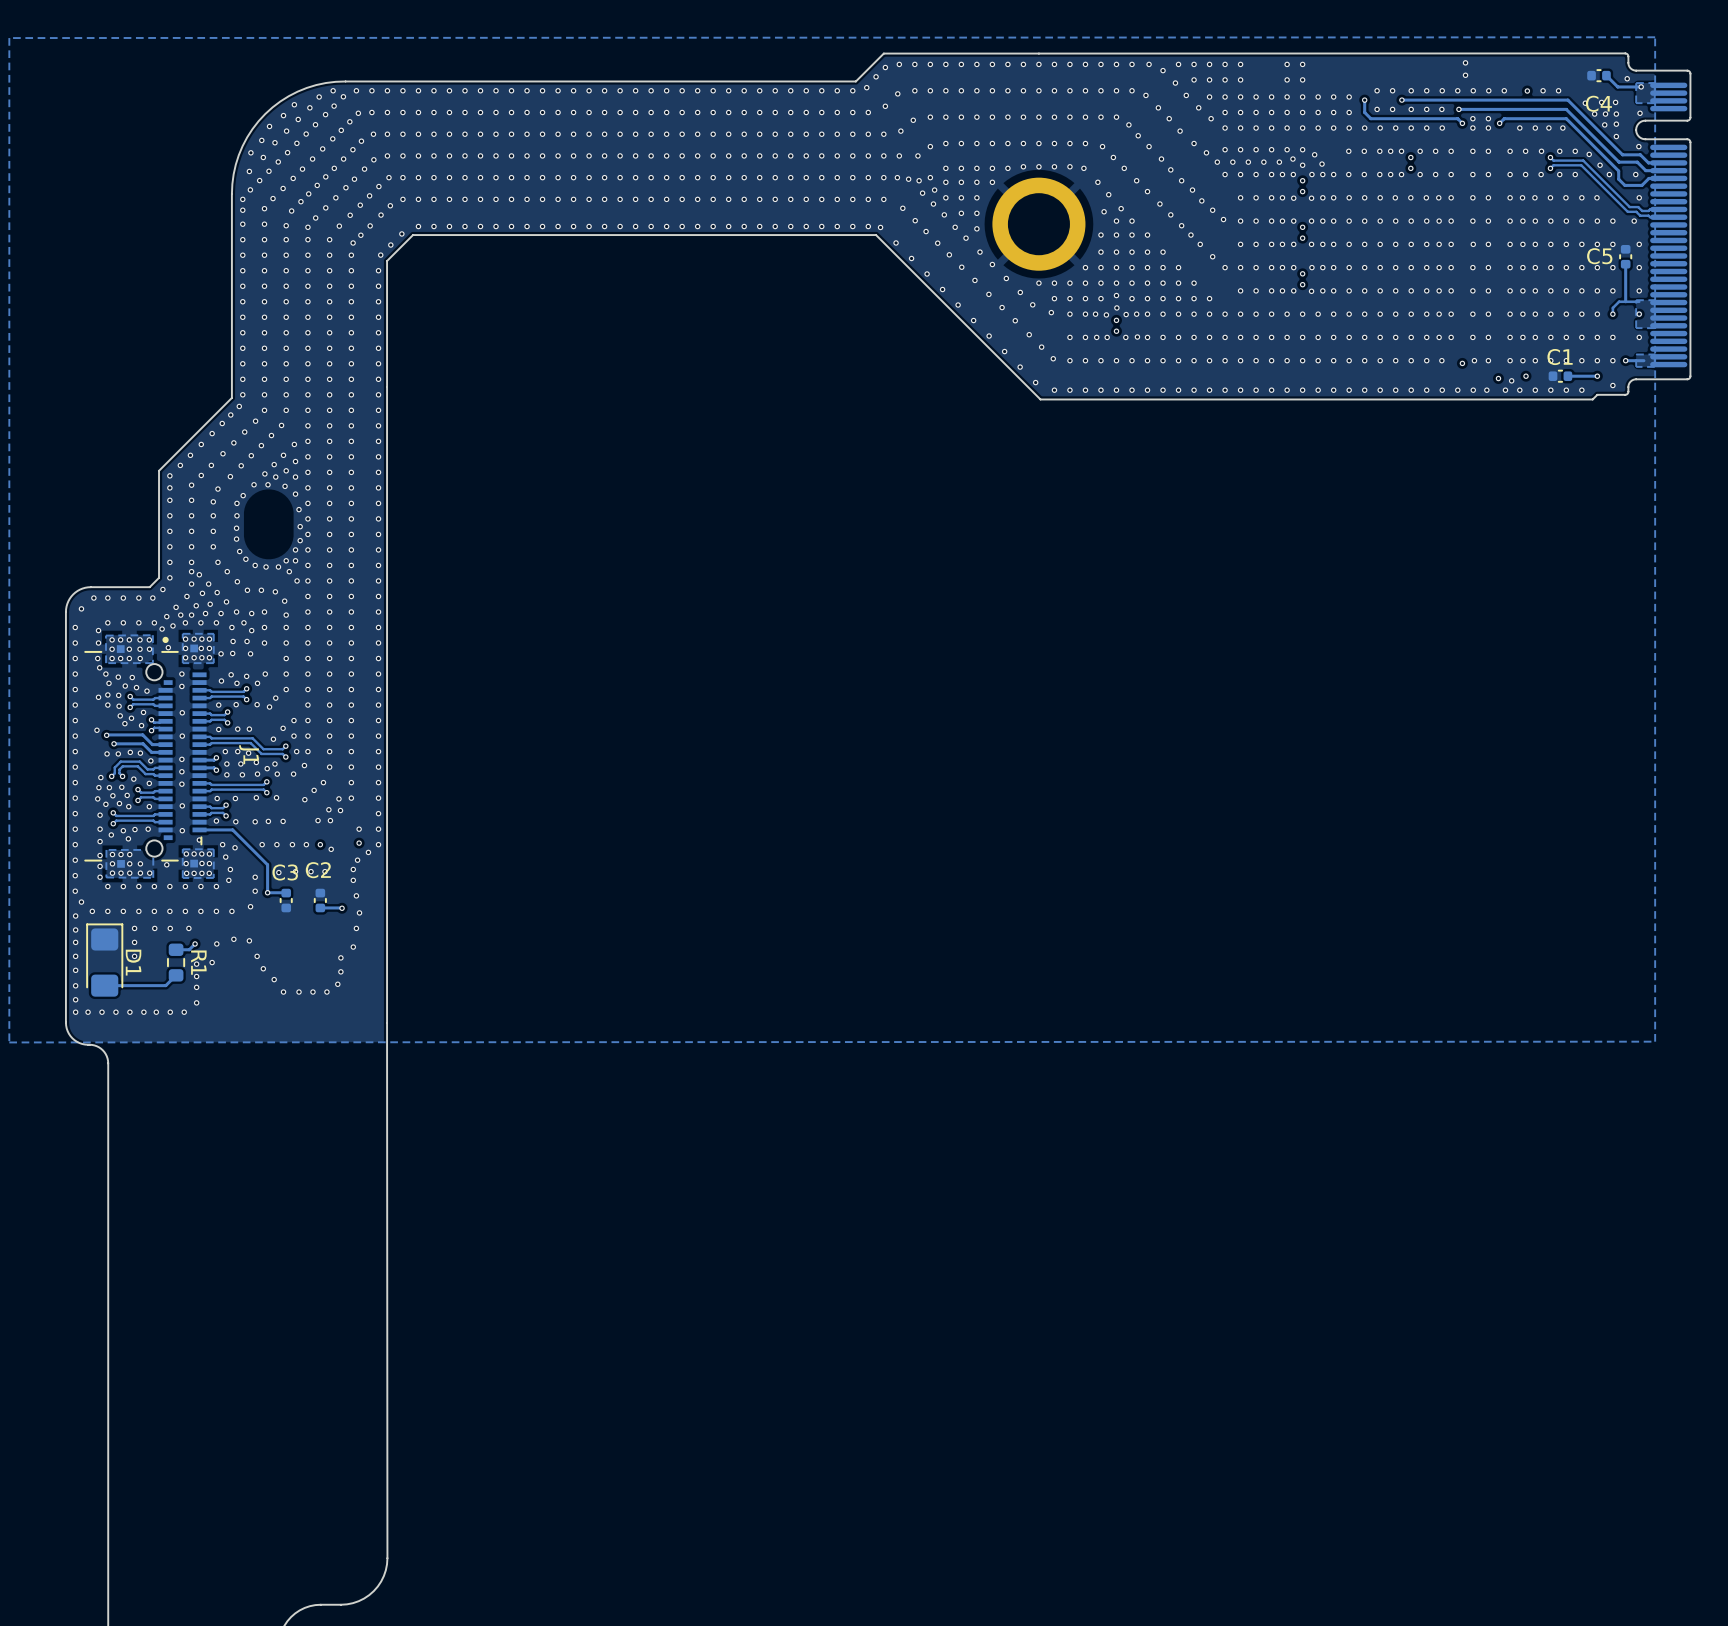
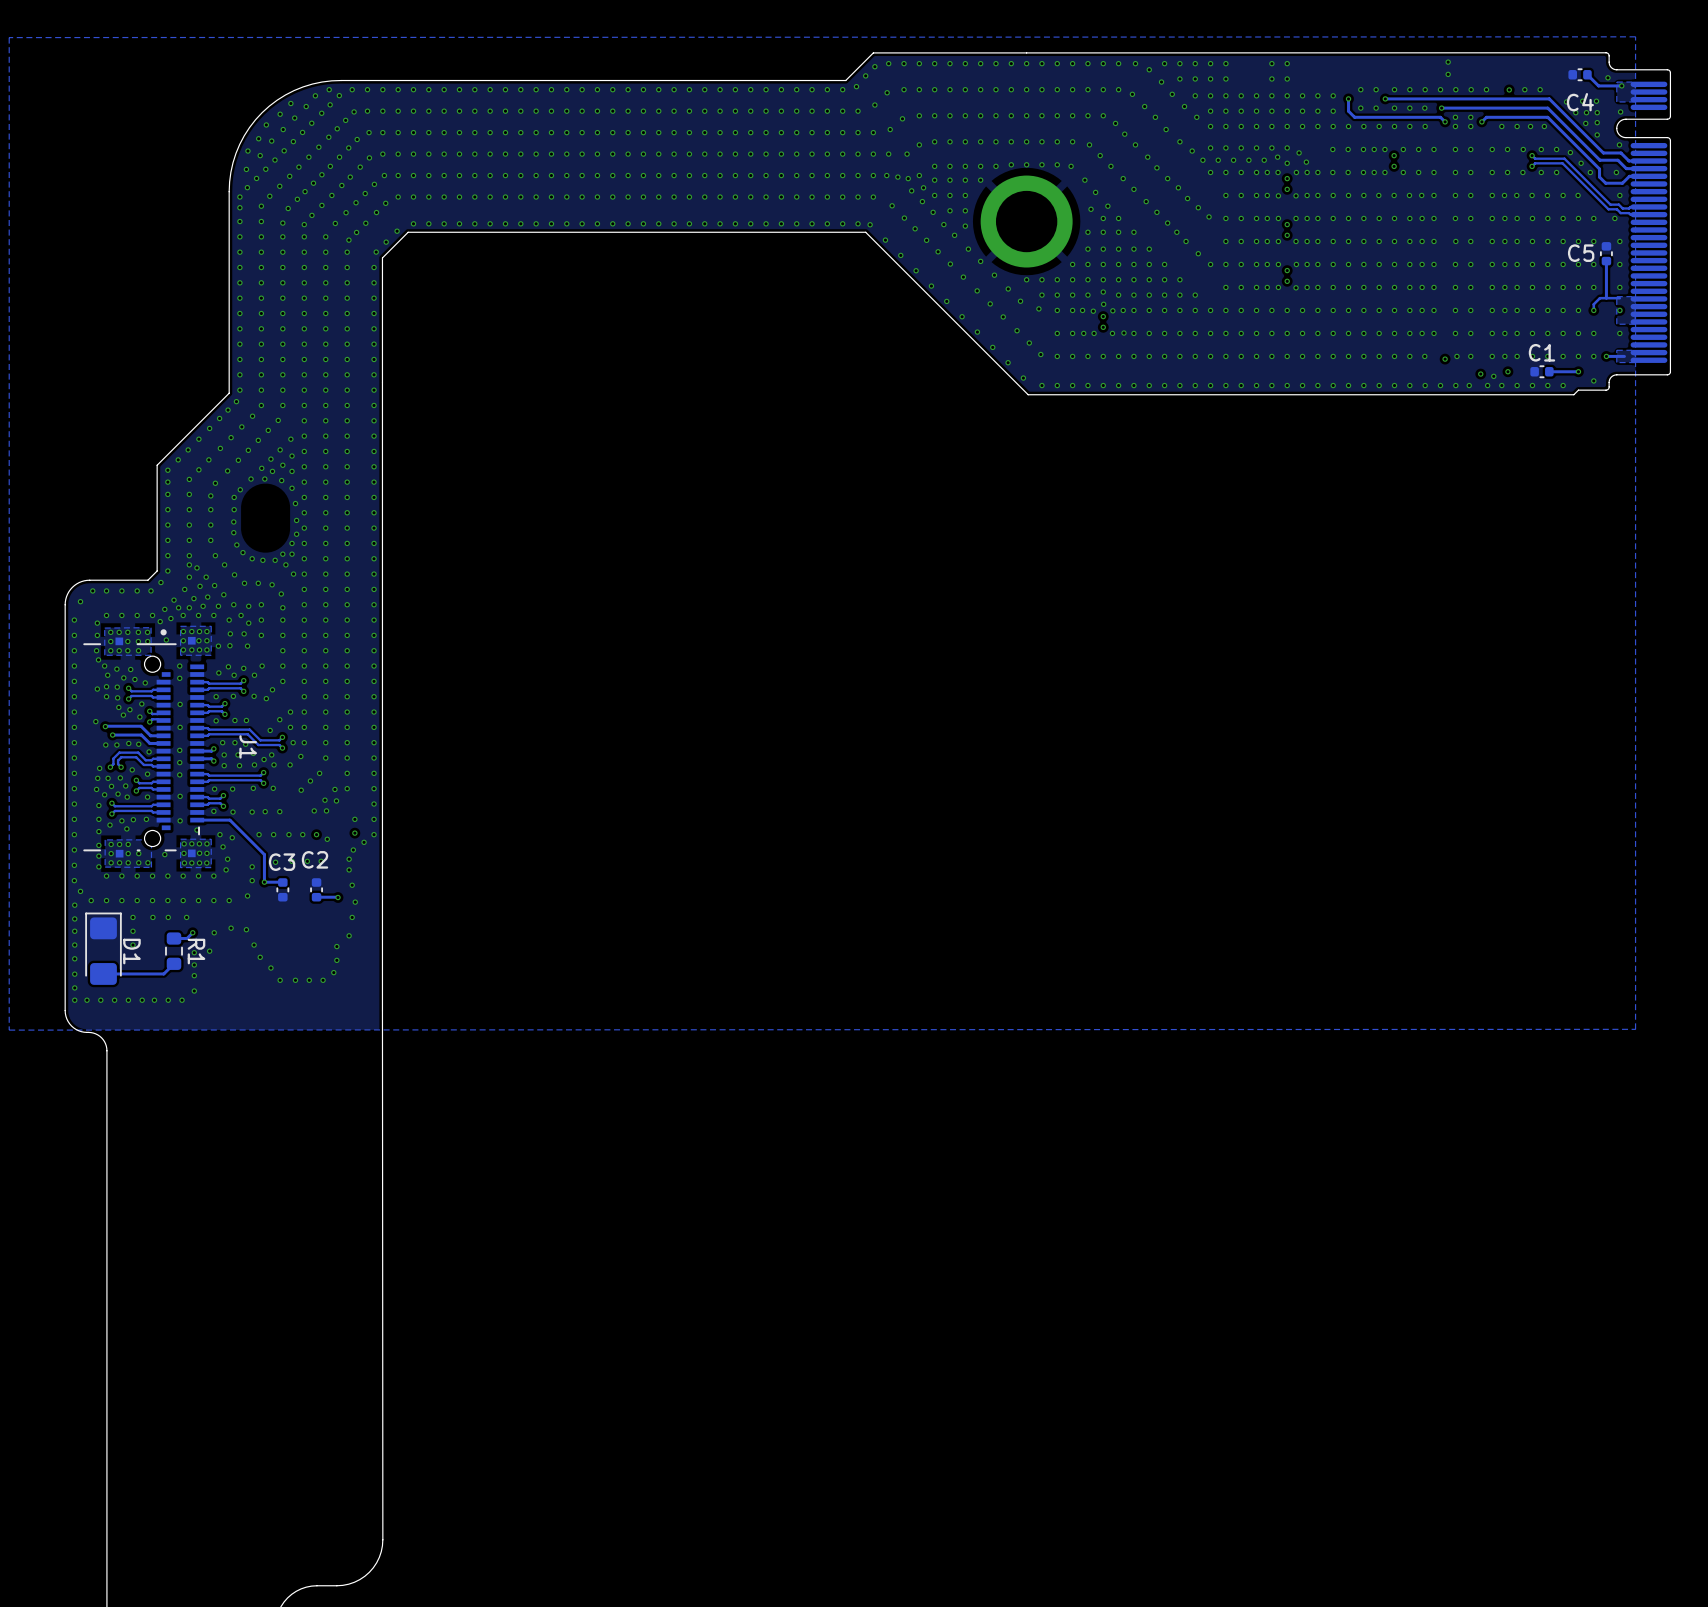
J1 footprint: [84, 636, 207, 868] -> [83, 629, 205, 858]

